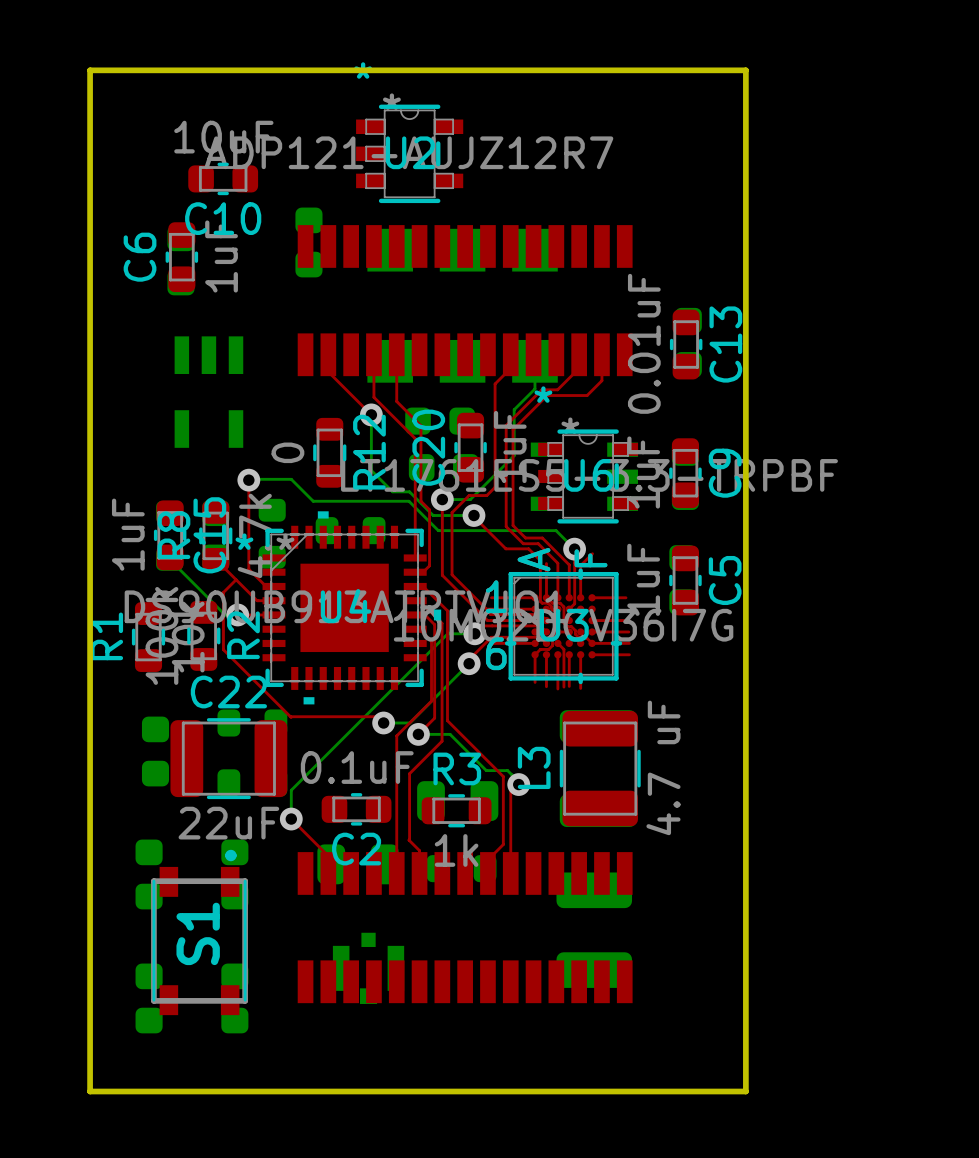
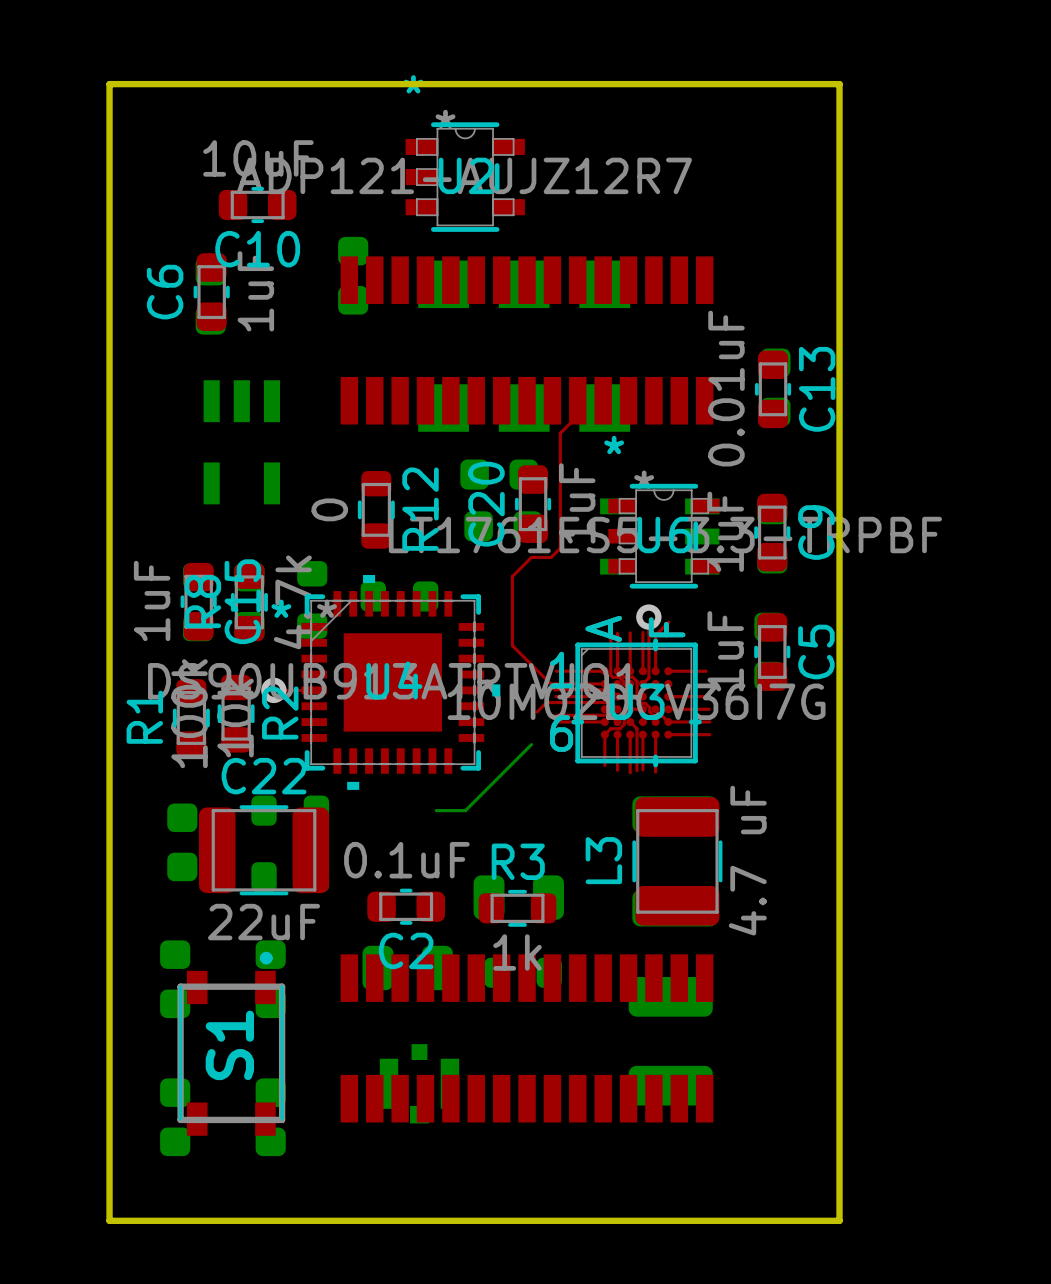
top track: (328, 354) (328, 371) (371, 414) -> none
top track: (373, 354) (373, 397) (415, 438) (415, 557) -> none
top track: (396, 354) (396, 401) (420, 425) (420, 501) (429, 509) (429, 565) (423, 572) (415, 572) -> none
top track: (579, 354) (579, 368) (557, 389) (541, 389) (505, 425) -> none
top track: (601, 354) (601, 380) (587, 395) (547, 395) (513, 429) (513, 525) (525, 538) (542, 538) (569, 564) -> (642, 632) (642, 634)
bottom track: (534, 361) (534, 388) (514, 409) (514, 455) (470, 499) (442, 499) -> none
bottom track: (371, 414) (371, 470) (392, 491) (409, 491) (433, 515) (473, 515) -> none
via: (371, 414) -> none
top track: (506, 426) (506, 526) (523, 543) (538, 543) (557, 563) -> none
top track: (248, 480) (248, 569) (266, 586) (274, 586) -> none
bottom track: (248, 480) (291, 479) (313, 501) (409, 501) (438, 530) (556, 530) (574, 549) -> none
via: (248, 480) -> none
top track: (442, 497) (442, 575) (487, 620) (491, 620) -> none
via: (442, 499) -> none
top track: (473, 515) (505, 548) (528, 548) (540, 560) (540, 563) -> none
via: (473, 515) -> none
bottom track: (169, 559) (225, 614) (237, 614) -> none
top track: (215, 559) (257, 600) (274, 600) -> none
top track: (236, 579) (223, 592) (223, 649) (291, 717) -> none
top track: (415, 586) (423, 586) (447, 610) (447, 720) (503, 776) (503, 844) (487, 859) (487, 873) -> none
top track: (415, 600) (419, 600) (442, 623) (442, 741) (409, 773) (409, 840) (419, 850) (419, 873) -> none
top track: (415, 614) (424, 614) (434, 624) (434, 718) (418, 734) -> none
top track: (415, 629) (419, 629) (431, 641) (431, 701) (396, 735) (396, 873) -> none
bottom track: (474, 633) (448, 632) (291, 790) (291, 819) -> none
via: (474, 633) -> none
R1 position: (148, 637) -> (191, 717)
top track: (491, 637) (466, 660) (469, 663) -> none
via: (469, 663) -> none
top track: (290, 716) (377, 716) (383, 722) -> none
via: (383, 722) -> none
bottom track: (418, 734) (450, 734) (486, 770) (507, 770) (513, 776) -> none
via: (418, 734) -> none
top track: (513, 776) (510, 778) (510, 873) -> none
via: (518, 784) -> none
top track: (291, 819) (328, 856) (328, 873) -> none
via: (291, 819) -> none

